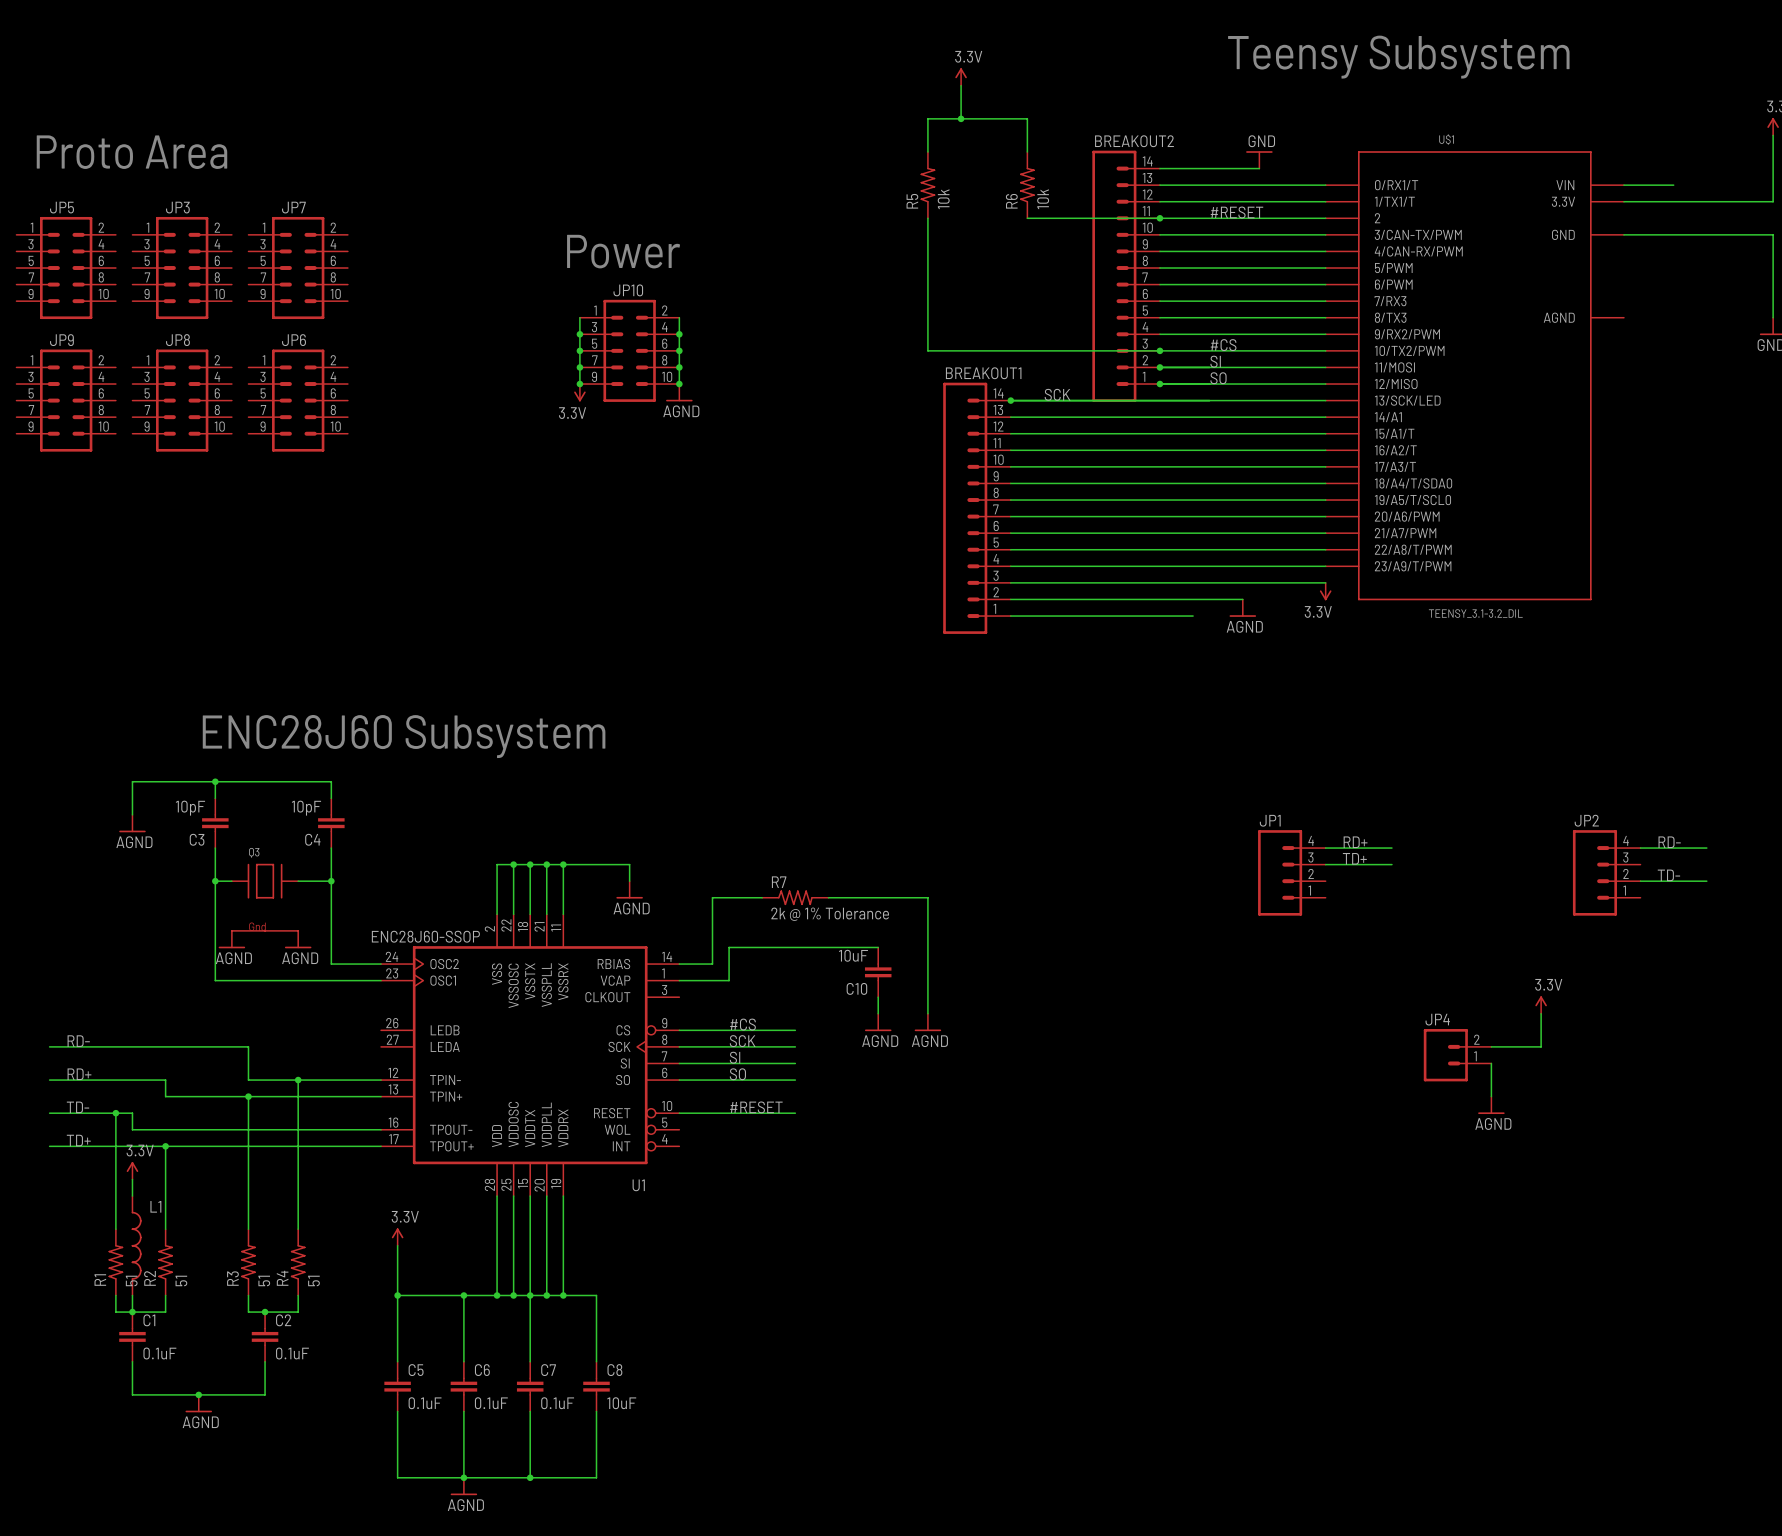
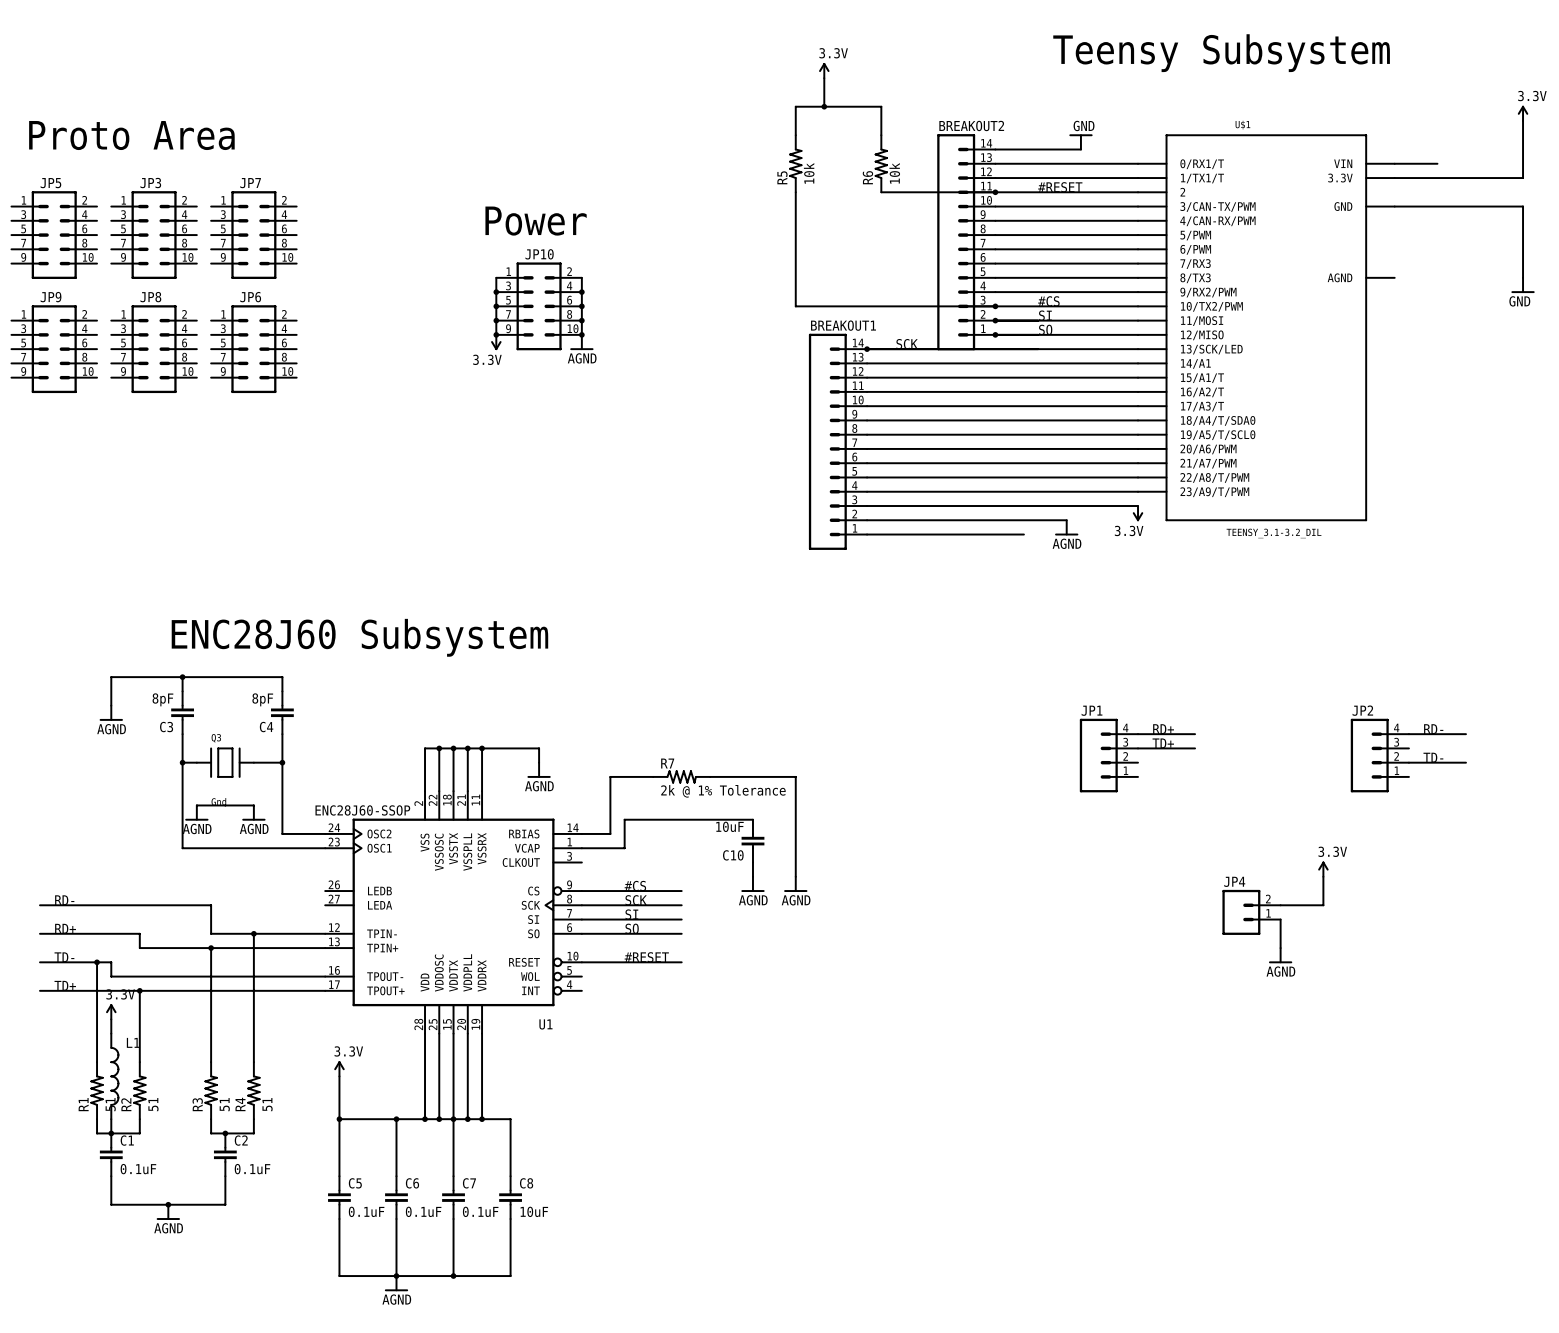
C3 value: 10pF (190, 808) -> 8pF (162, 699)
C4 value: 10pF (306, 808) -> 8pF (262, 699)

